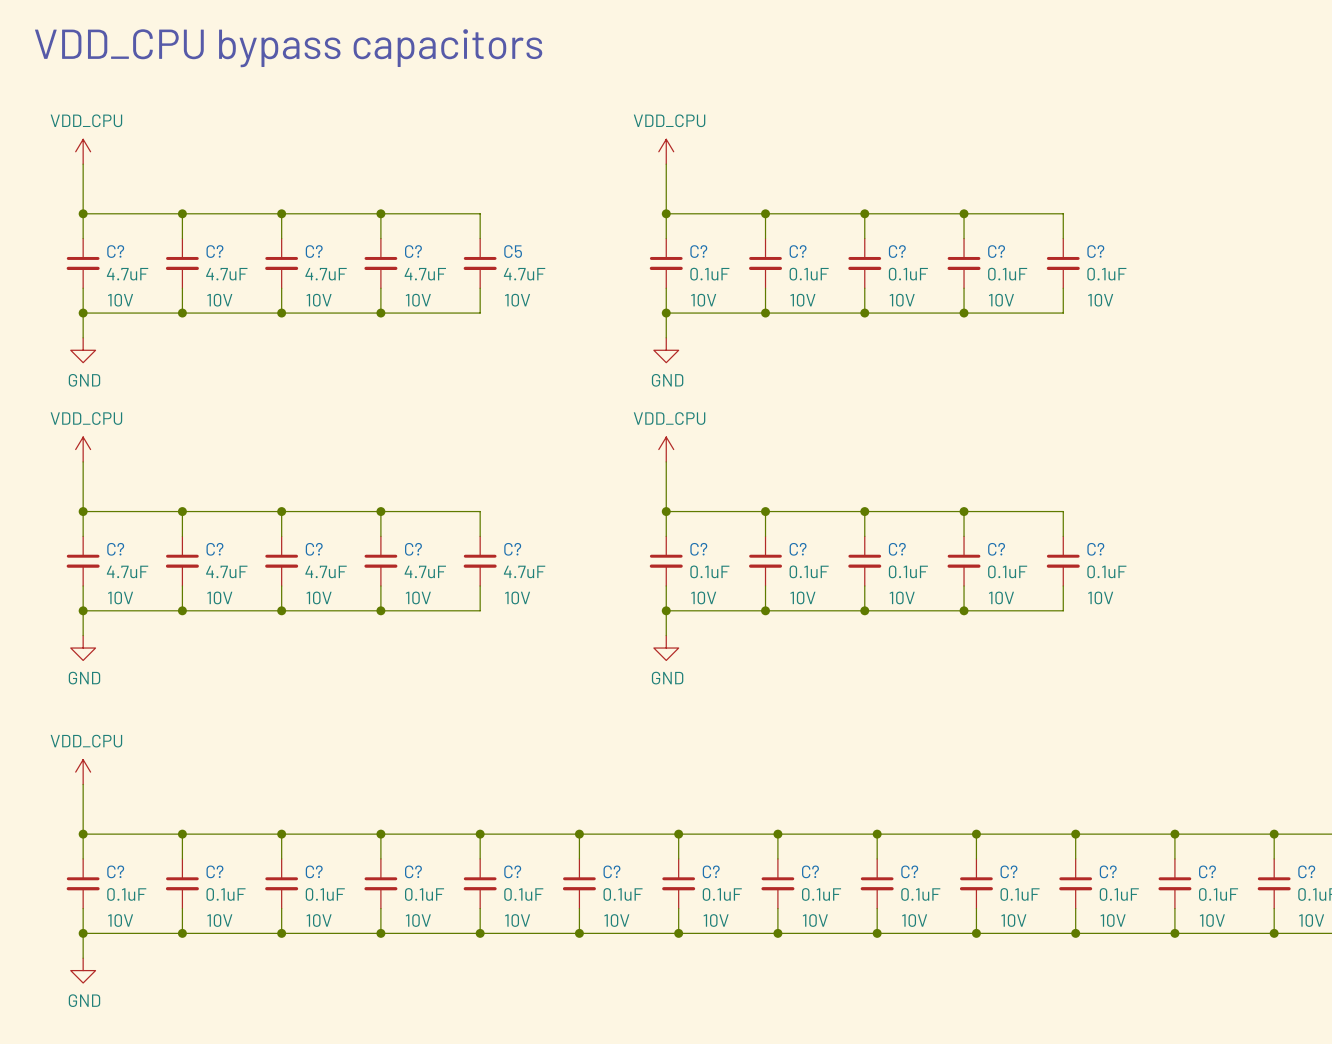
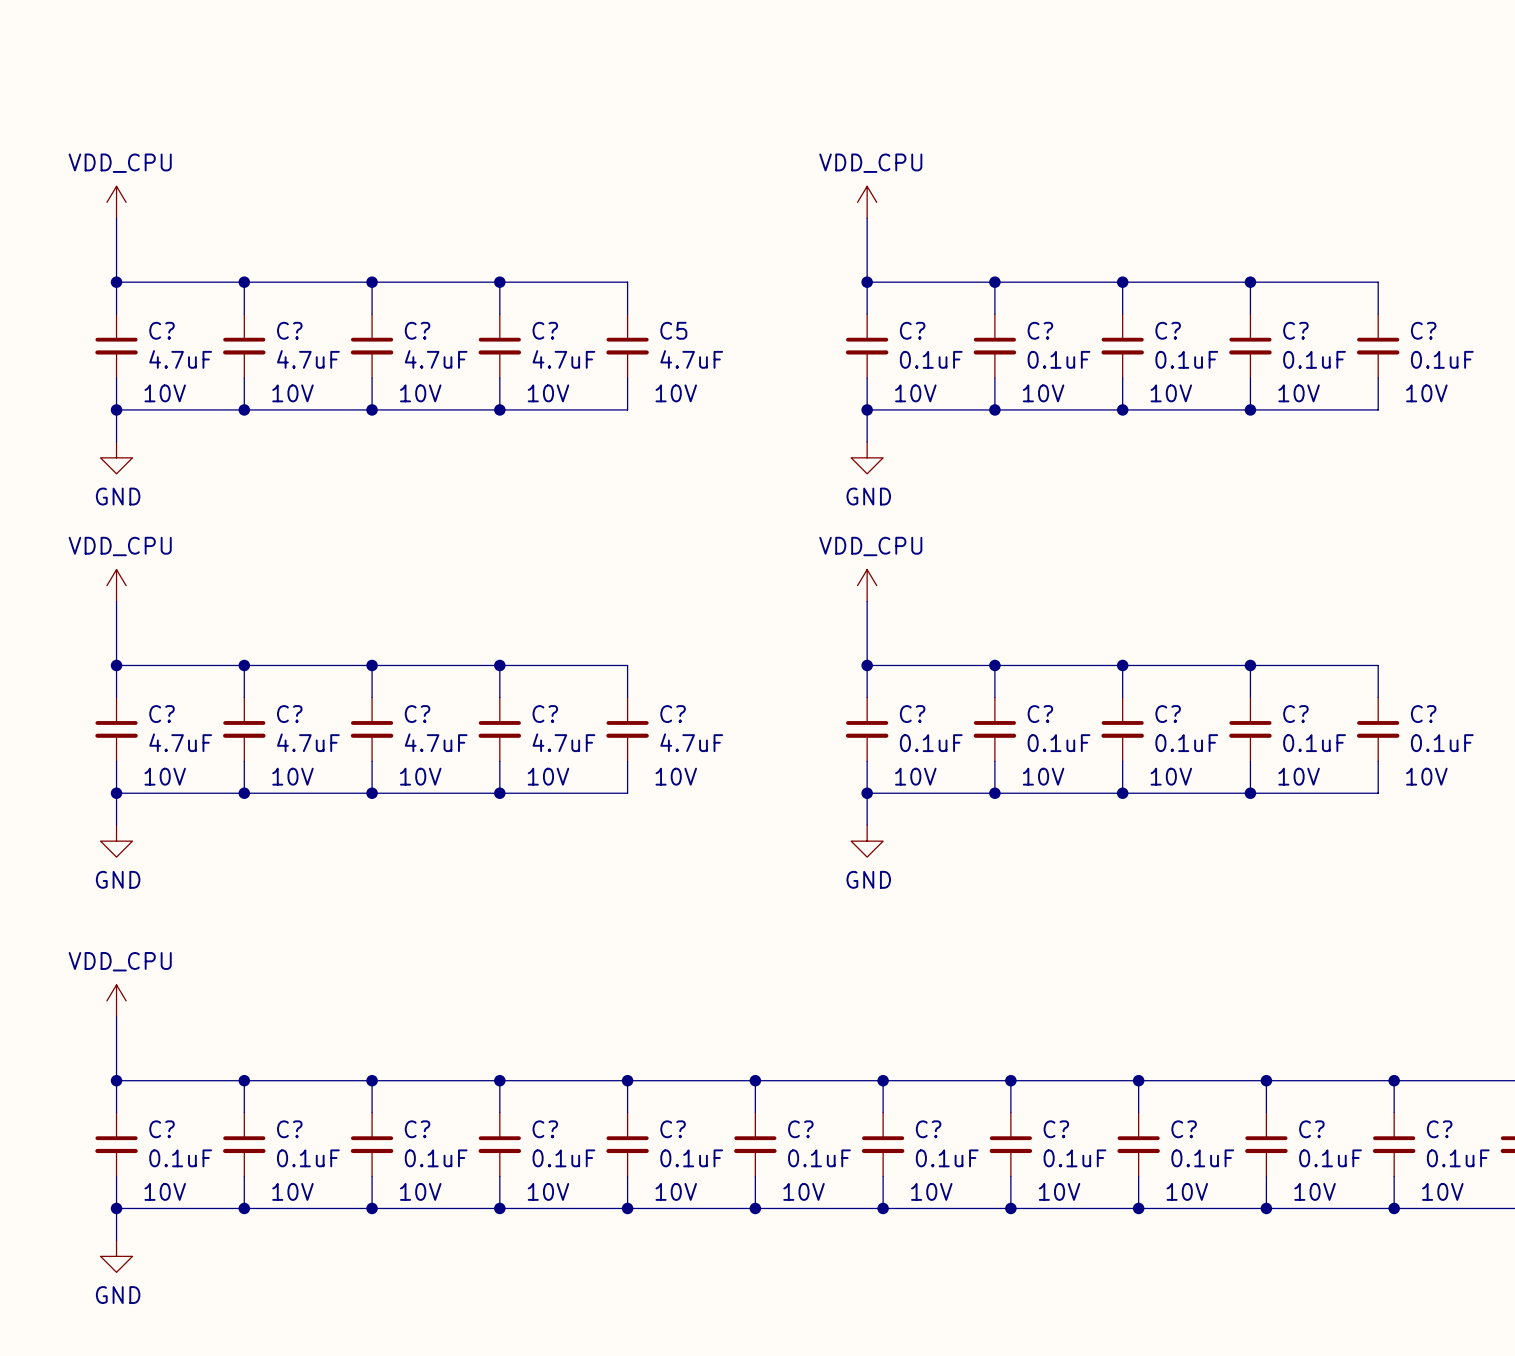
text: VDD_CPU bypass capacitors (288, 48) -> none

